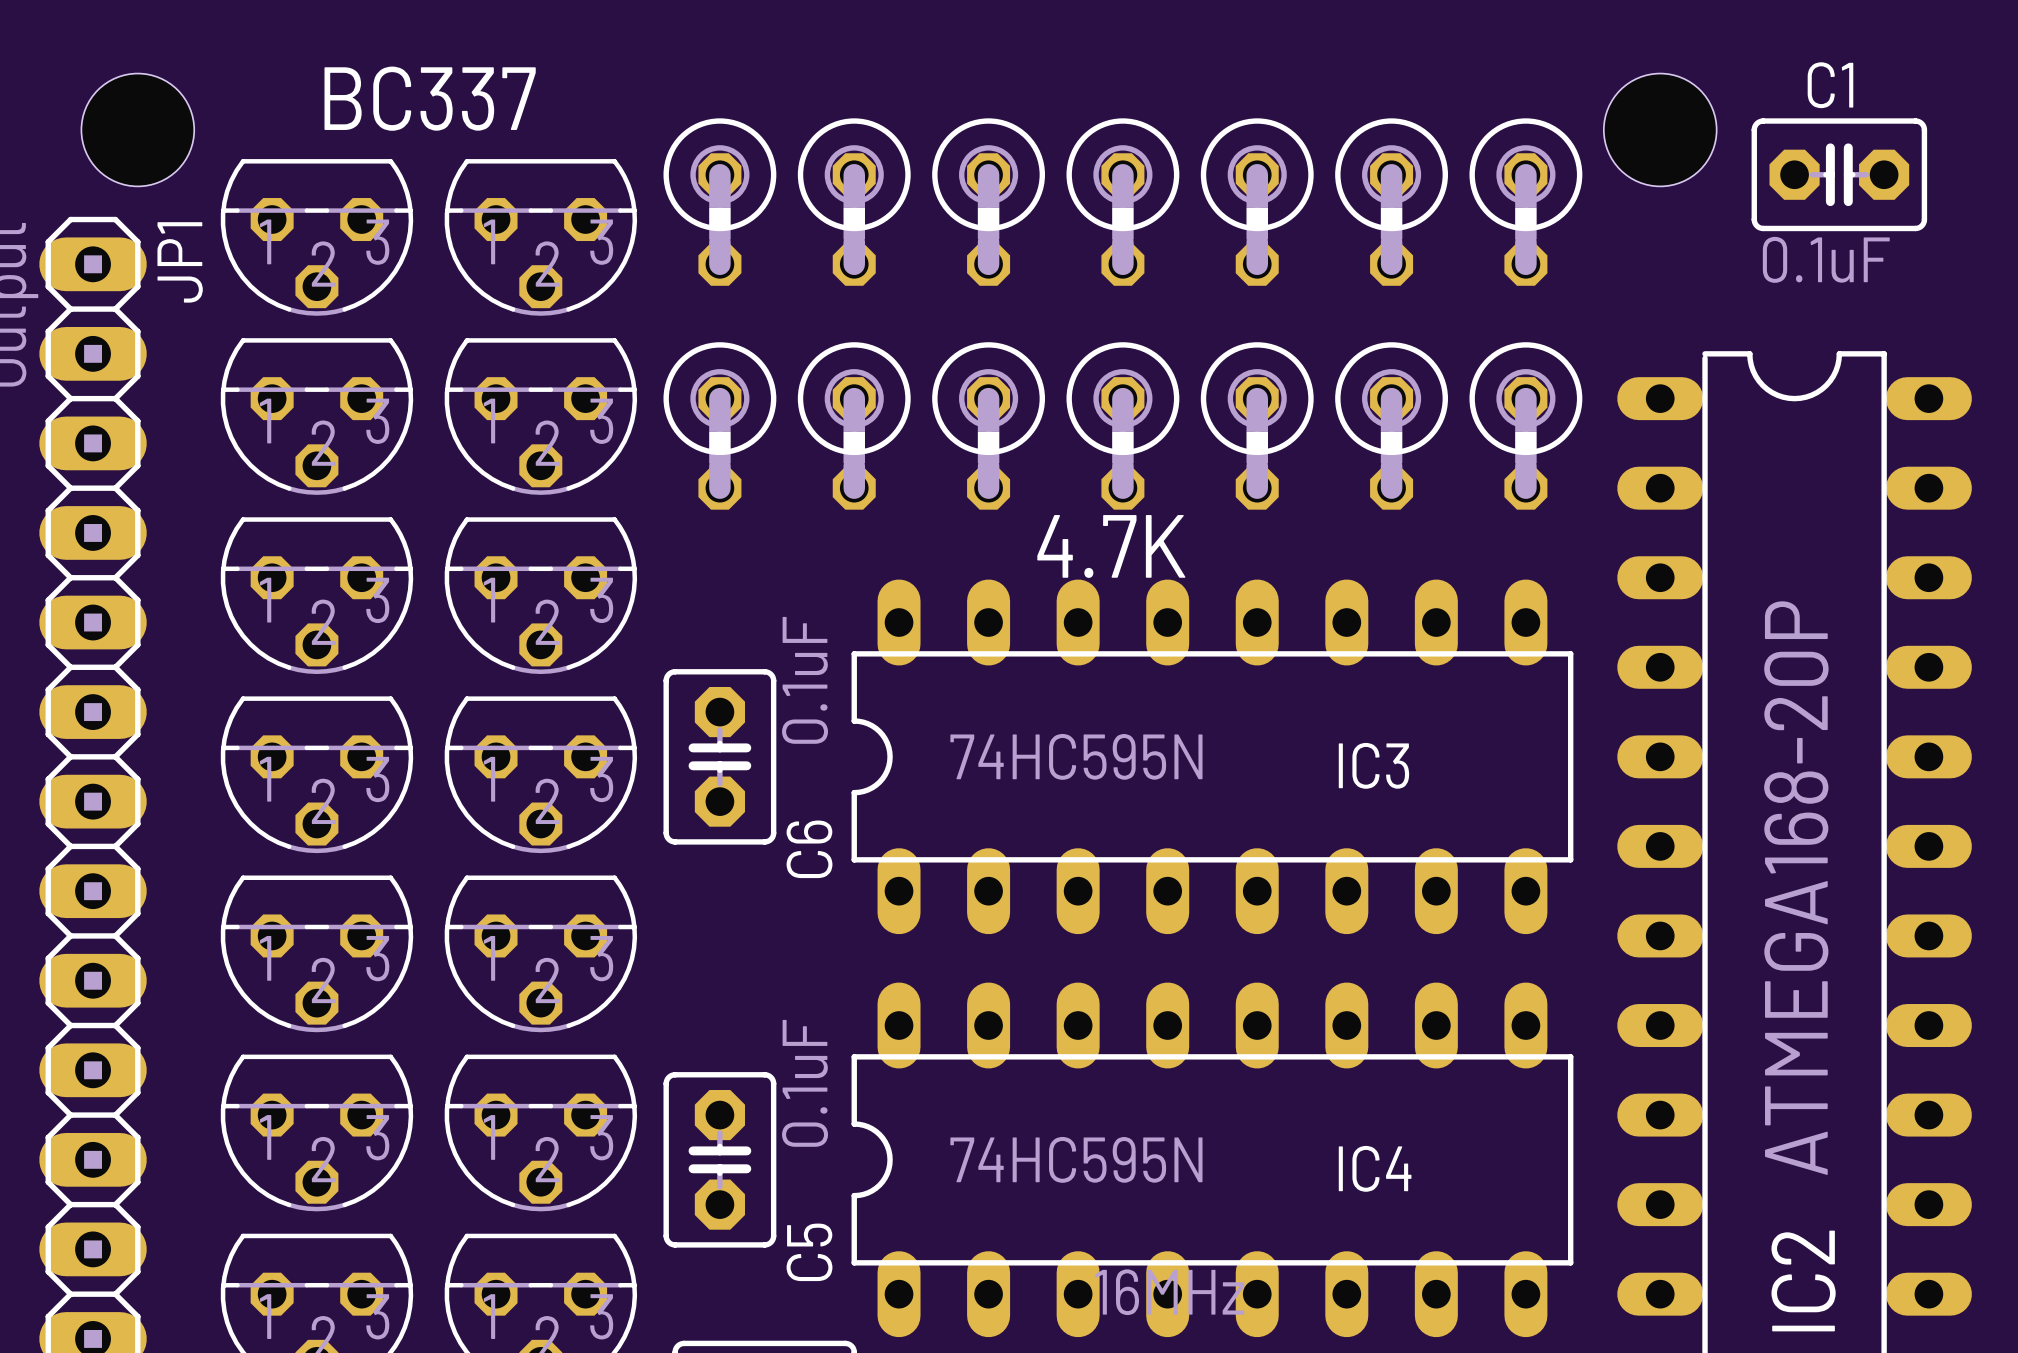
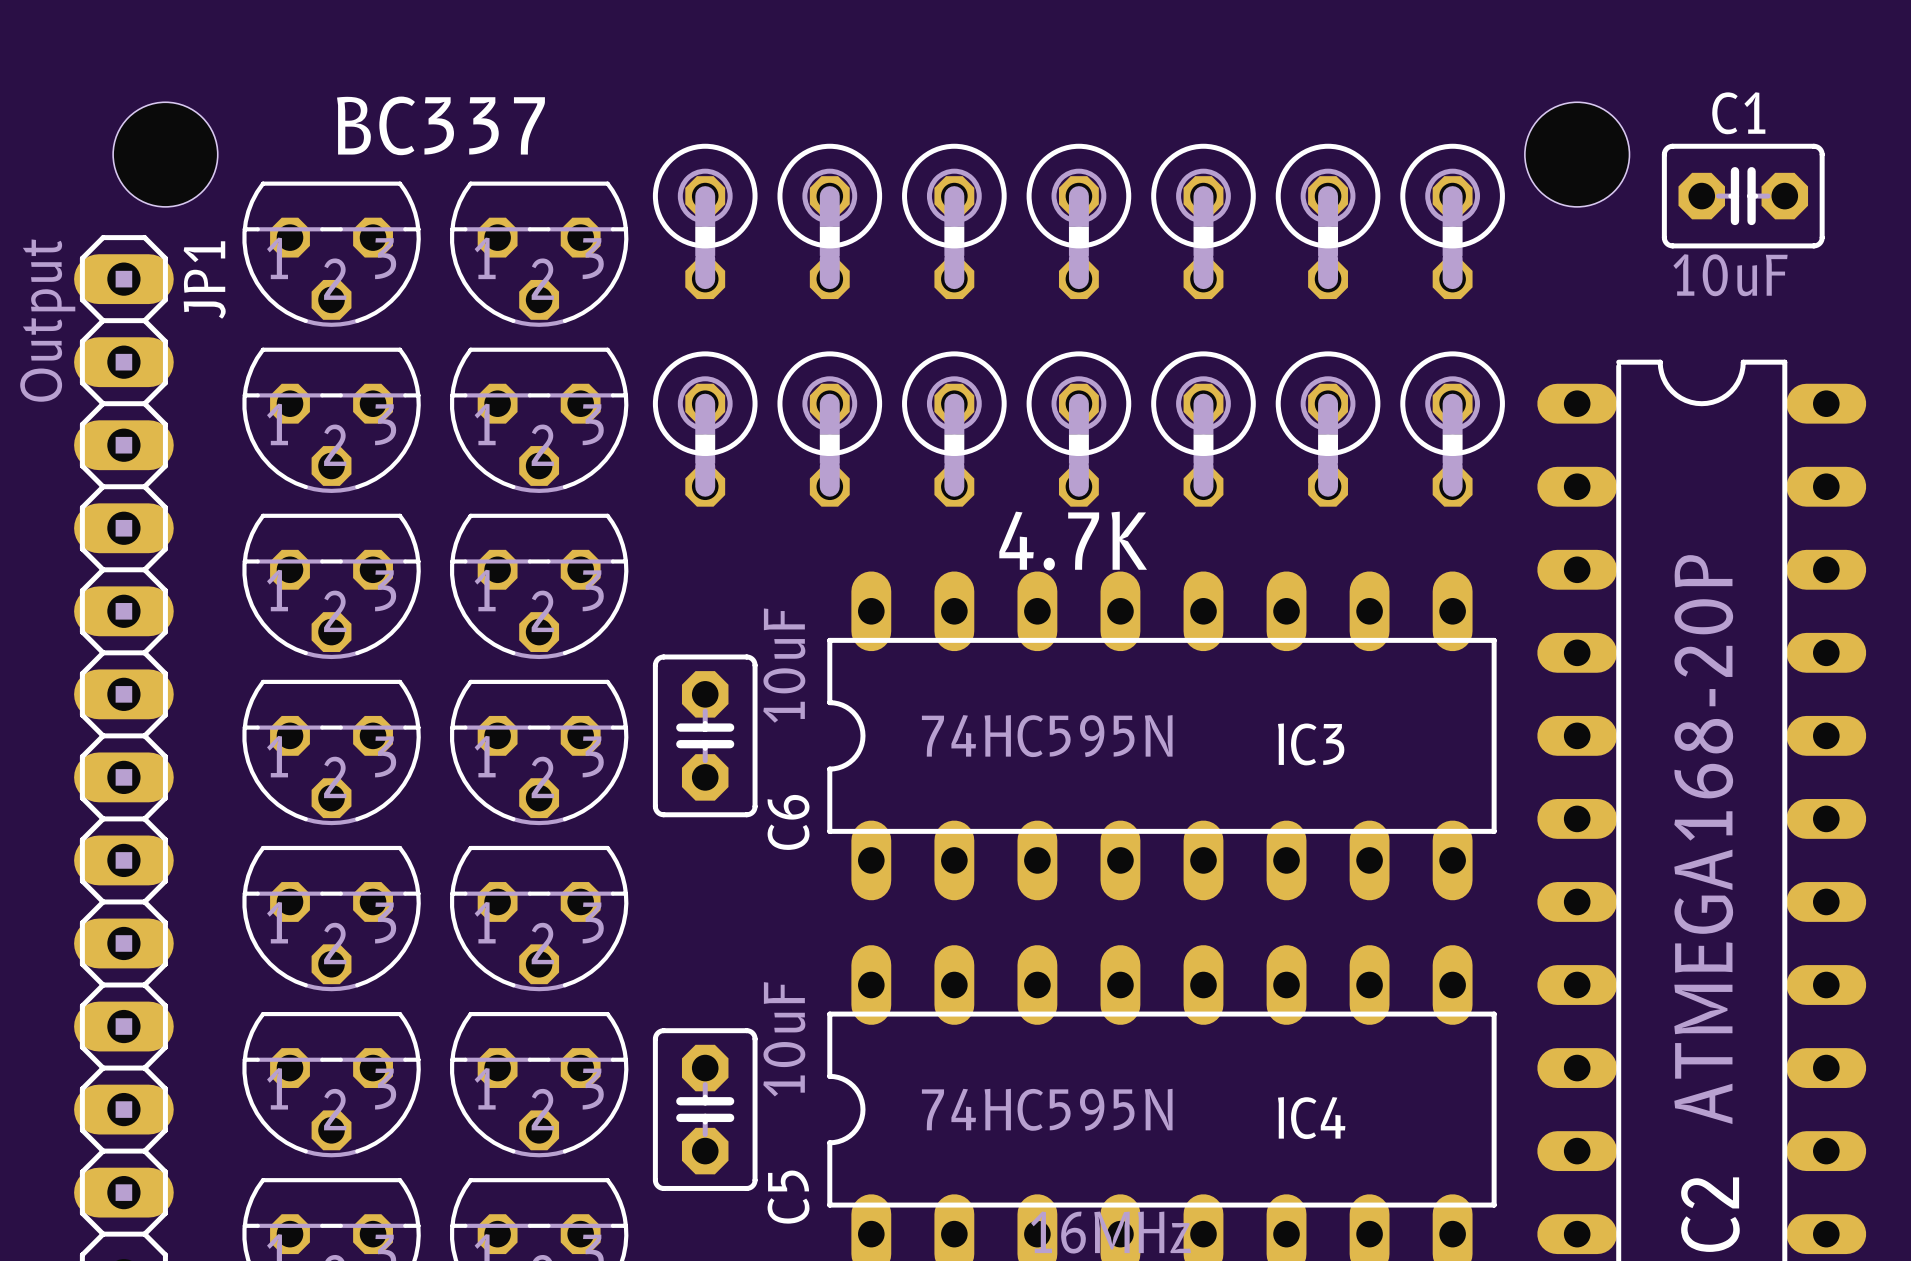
C1 value: 0.1uF (1826, 259) -> 10uF (1730, 275)
C6 value: 0.1uF (805, 680) -> 10uF (784, 665)
C5 value: 0.1uF (805, 1083) -> 10uF (784, 1039)

